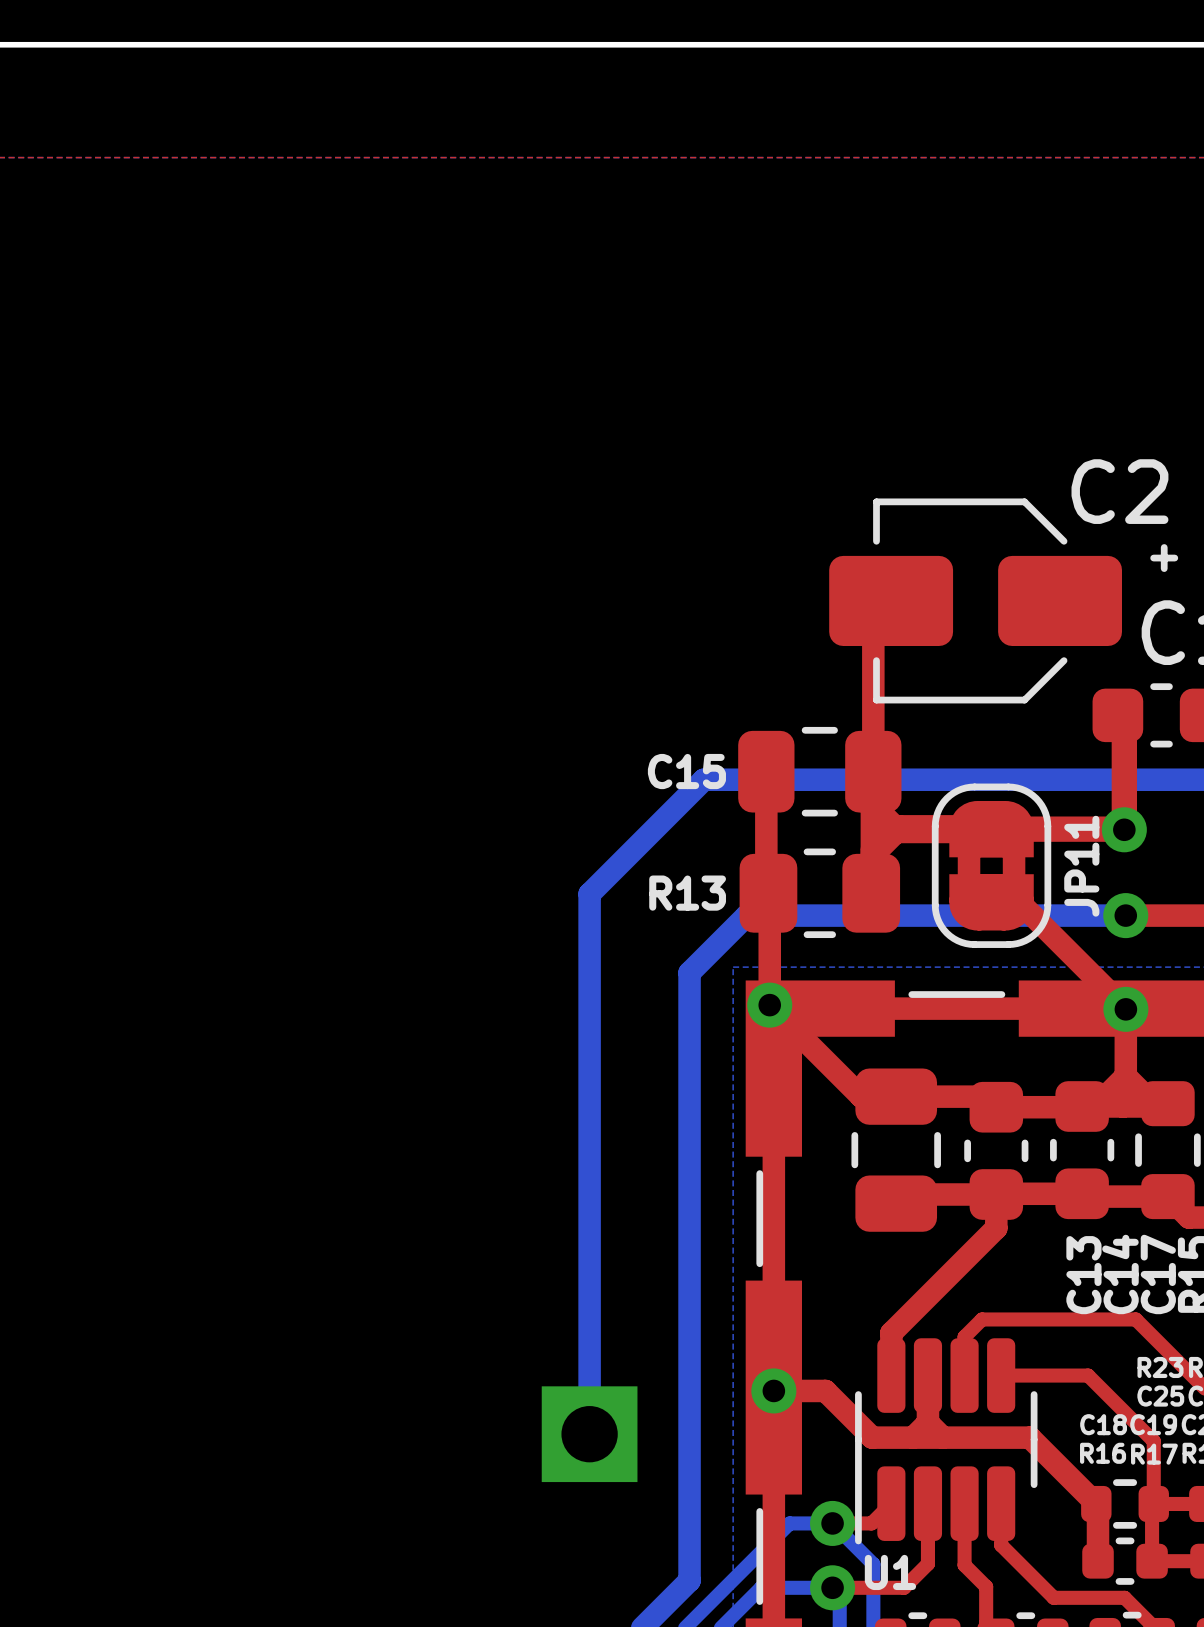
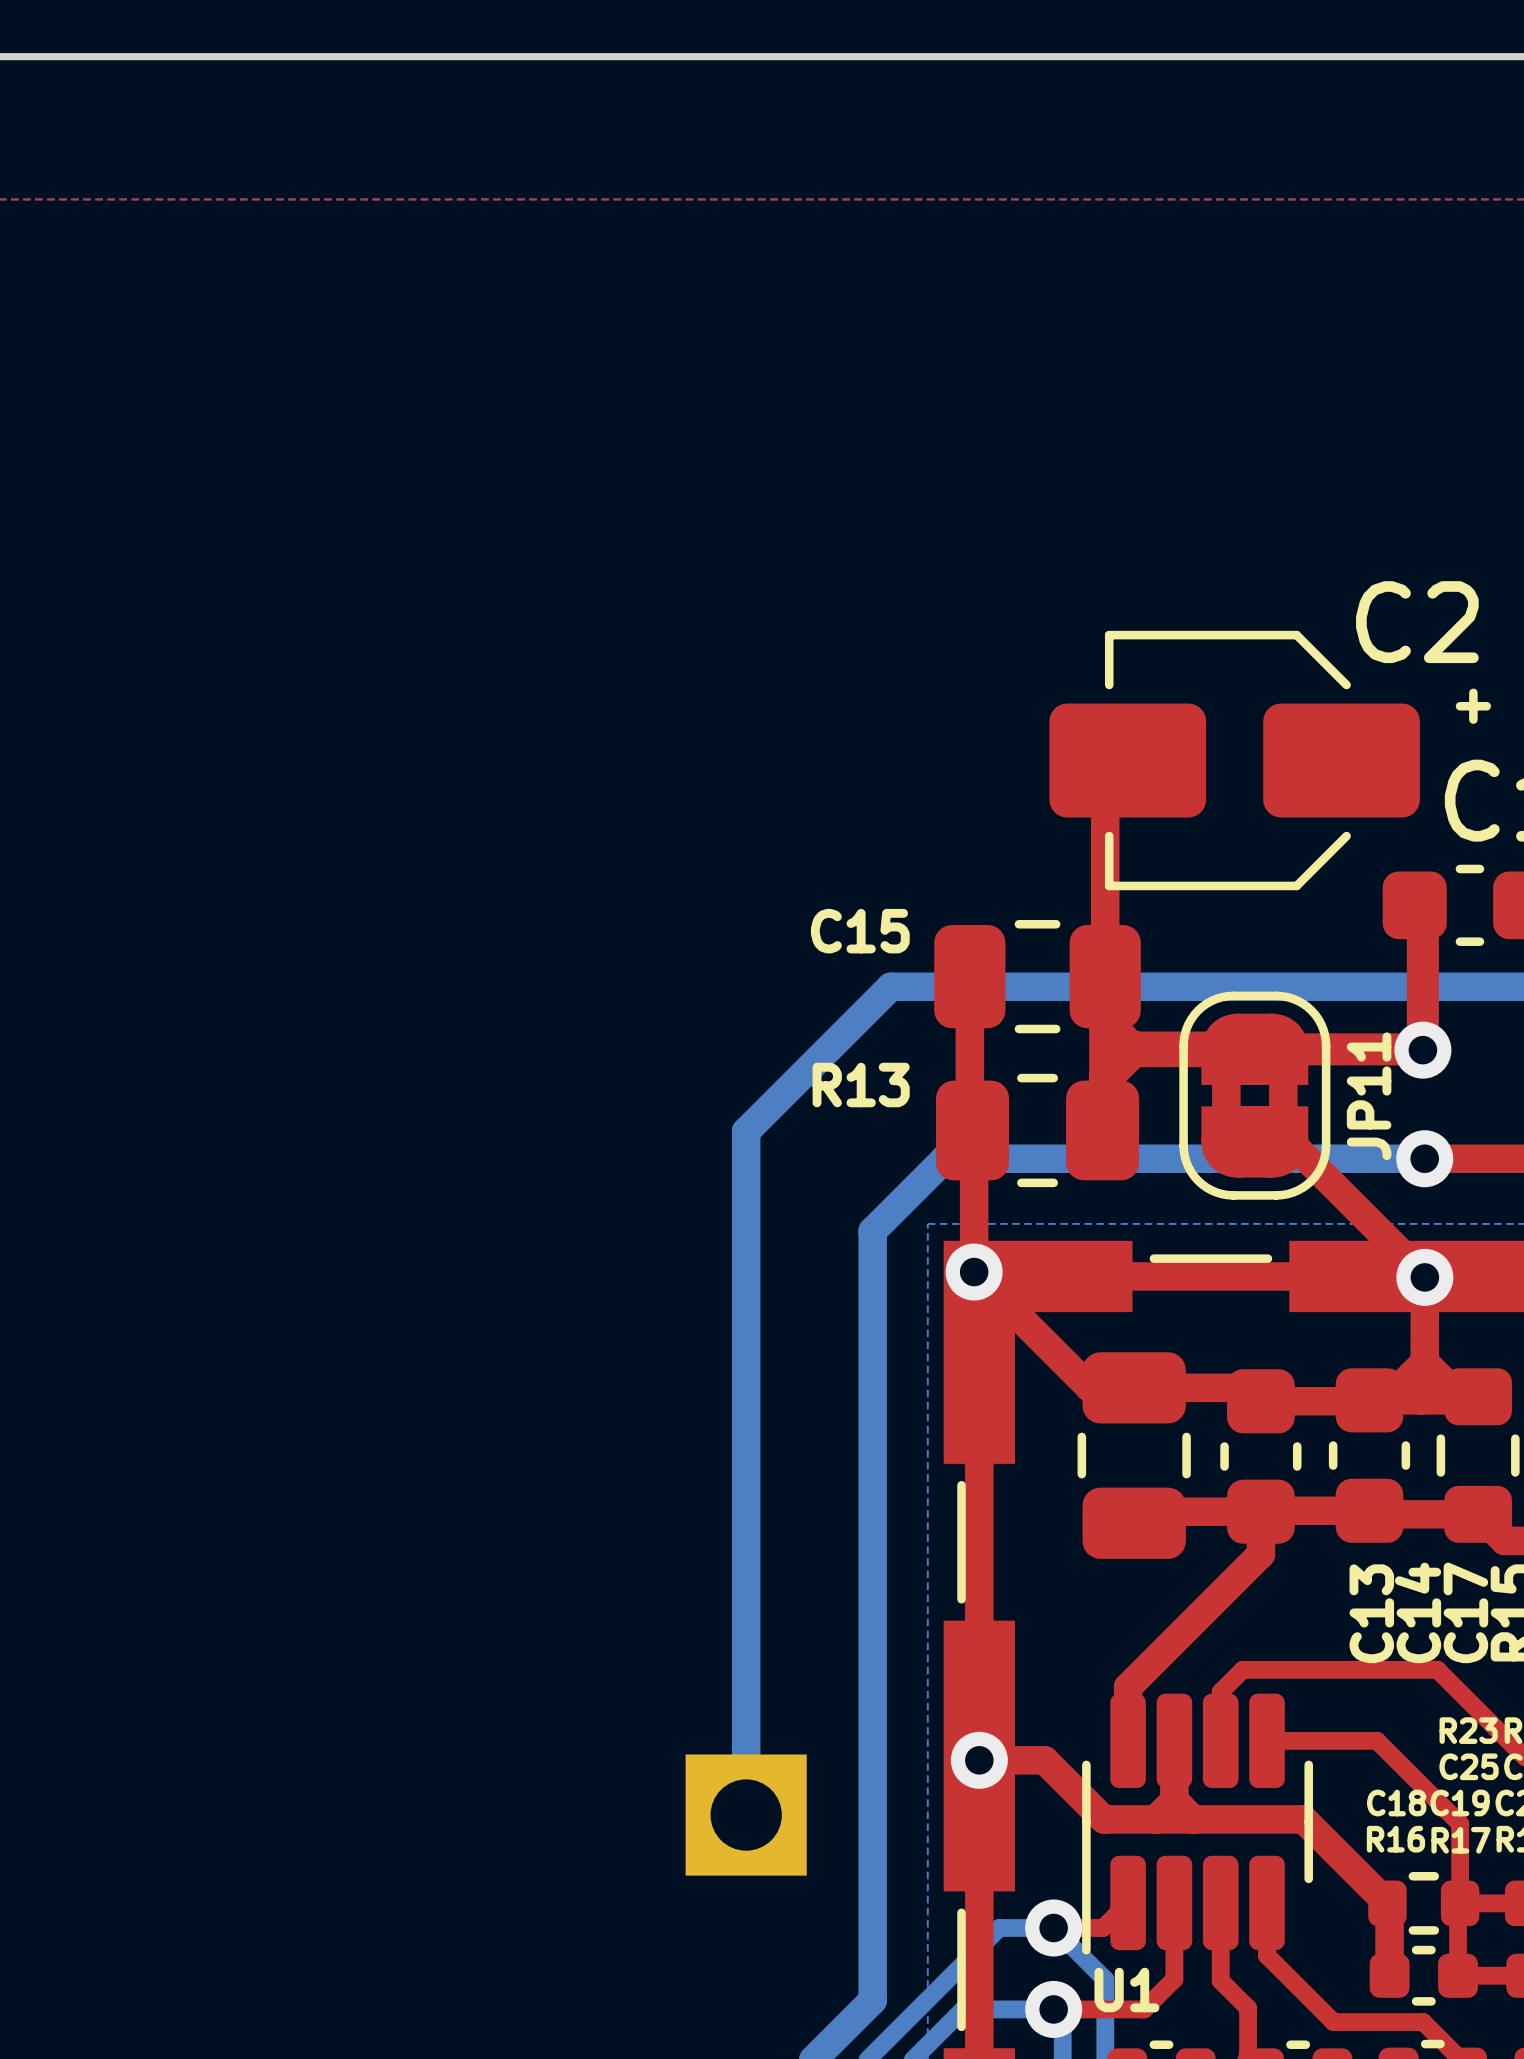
C15 name position: C15 (686, 771) -> C15 (860, 931)
R13 name position: R13 (687, 893) -> R13 (861, 1085)

